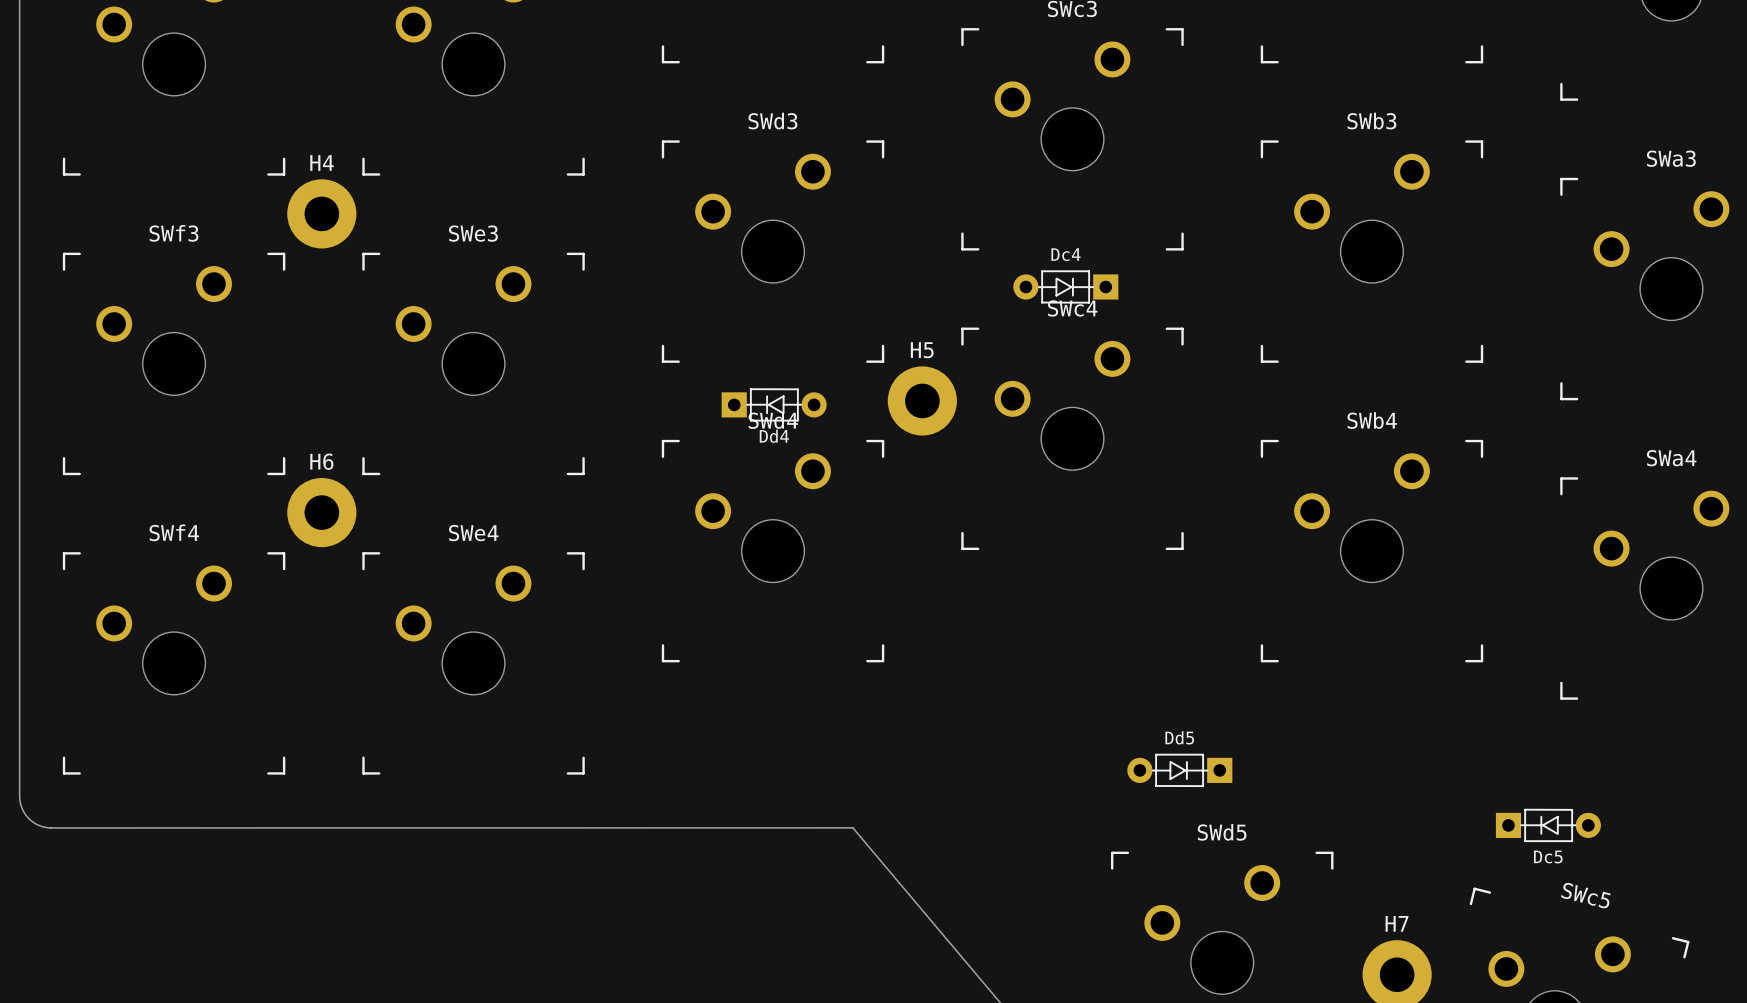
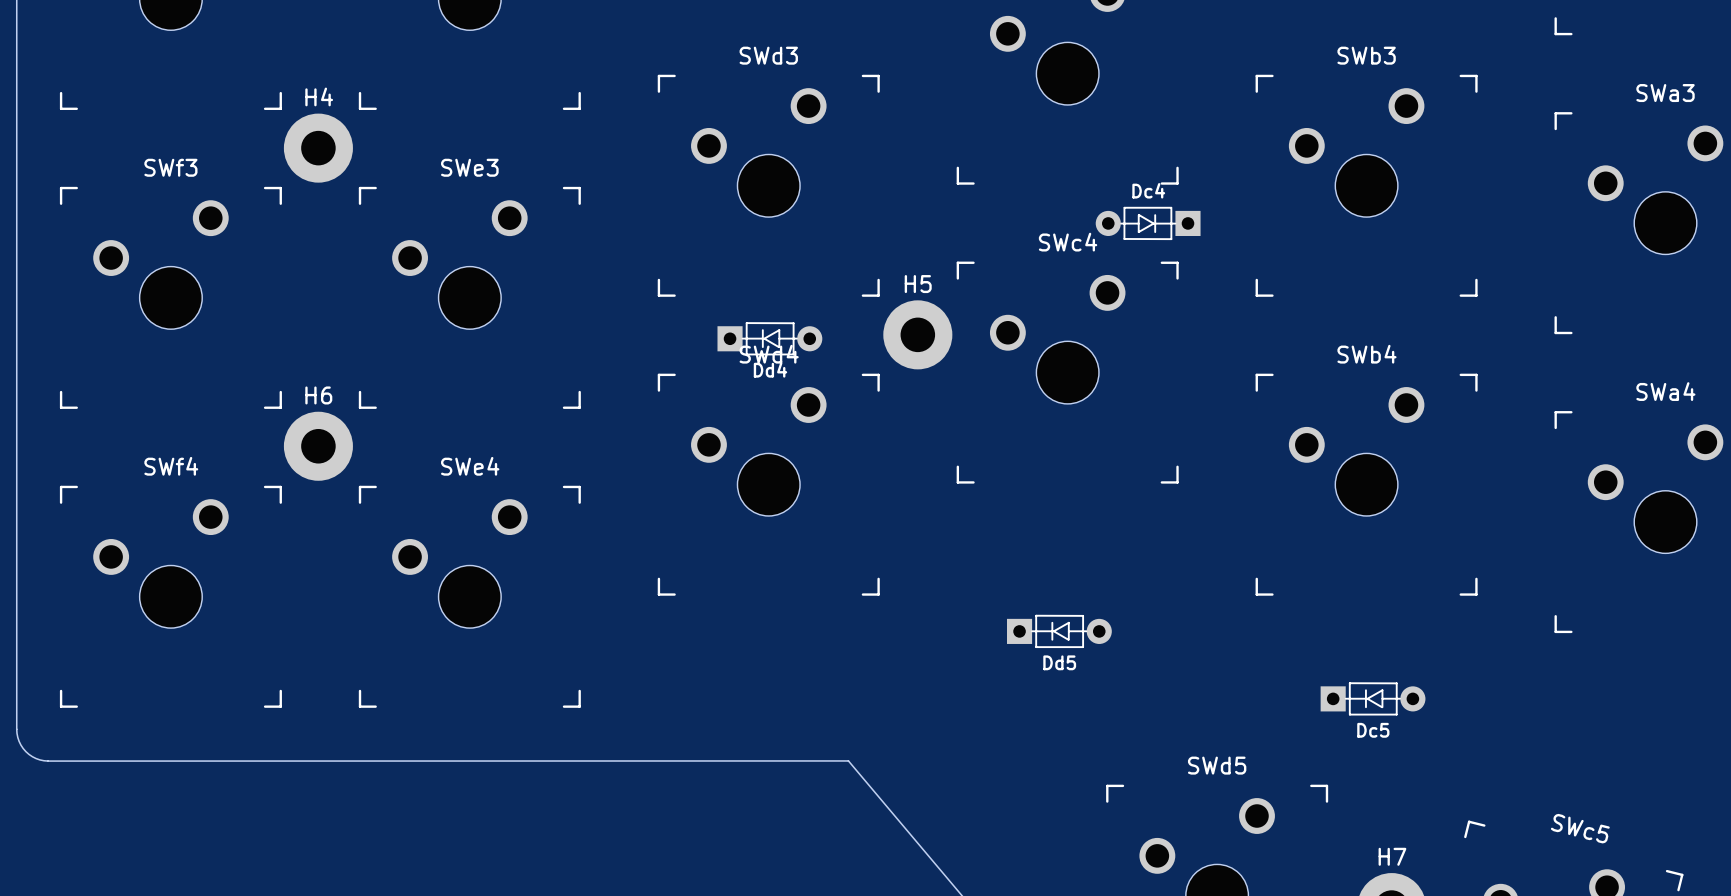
Dc4 position: (1065, 286) -> (1148, 223)
Dd5 rotation: 0° (1179, 770) -> 180° (1059, 631)
Dd5 position: (1179, 770) -> (1059, 631)
Dc5 position: (1548, 825) -> (1373, 698)

